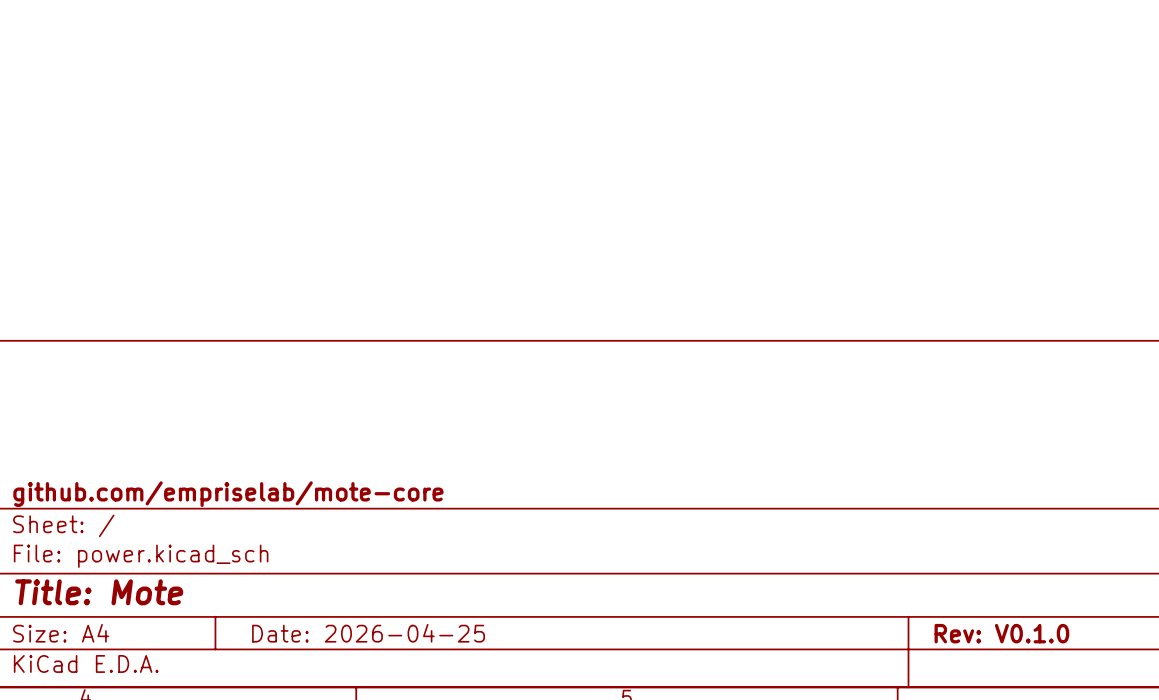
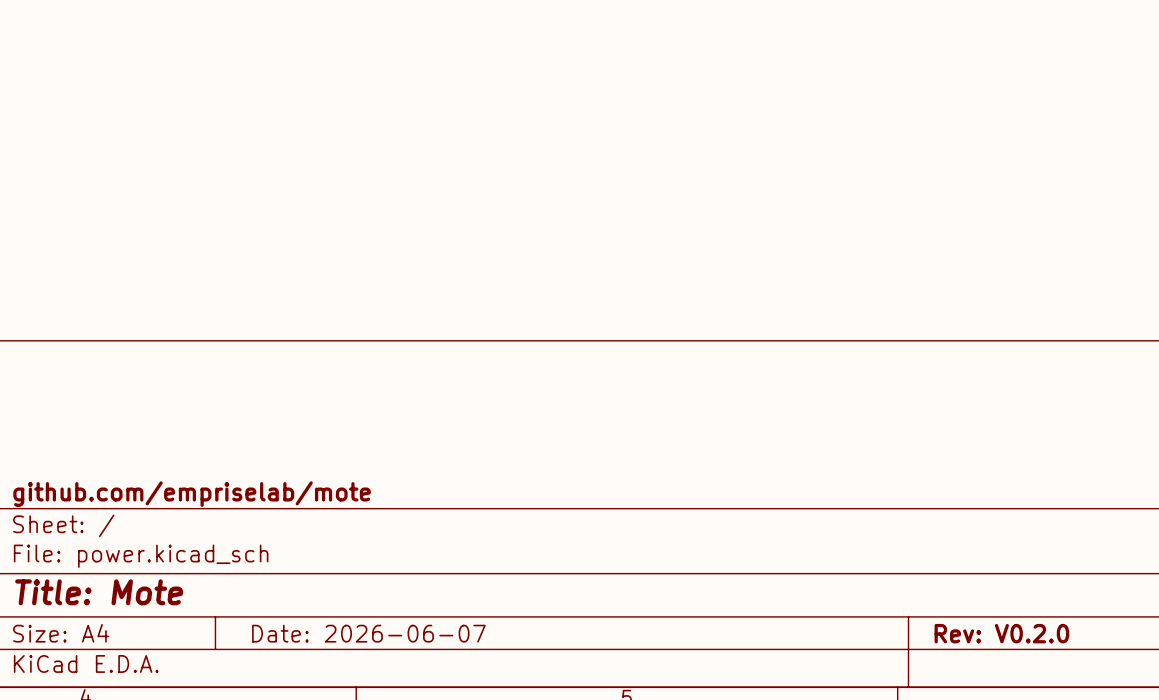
title block: github.com/empriselab/mote-core (228, 494) -> github.com/empriselab/mote (192, 494)
title block: Date: 2026-04-25 (368, 633) -> Date: 2026-06-07 (368, 633)
title block: Rev: V0.1.0 (1001, 633) -> Rev: V0.2.0 (1001, 633)

